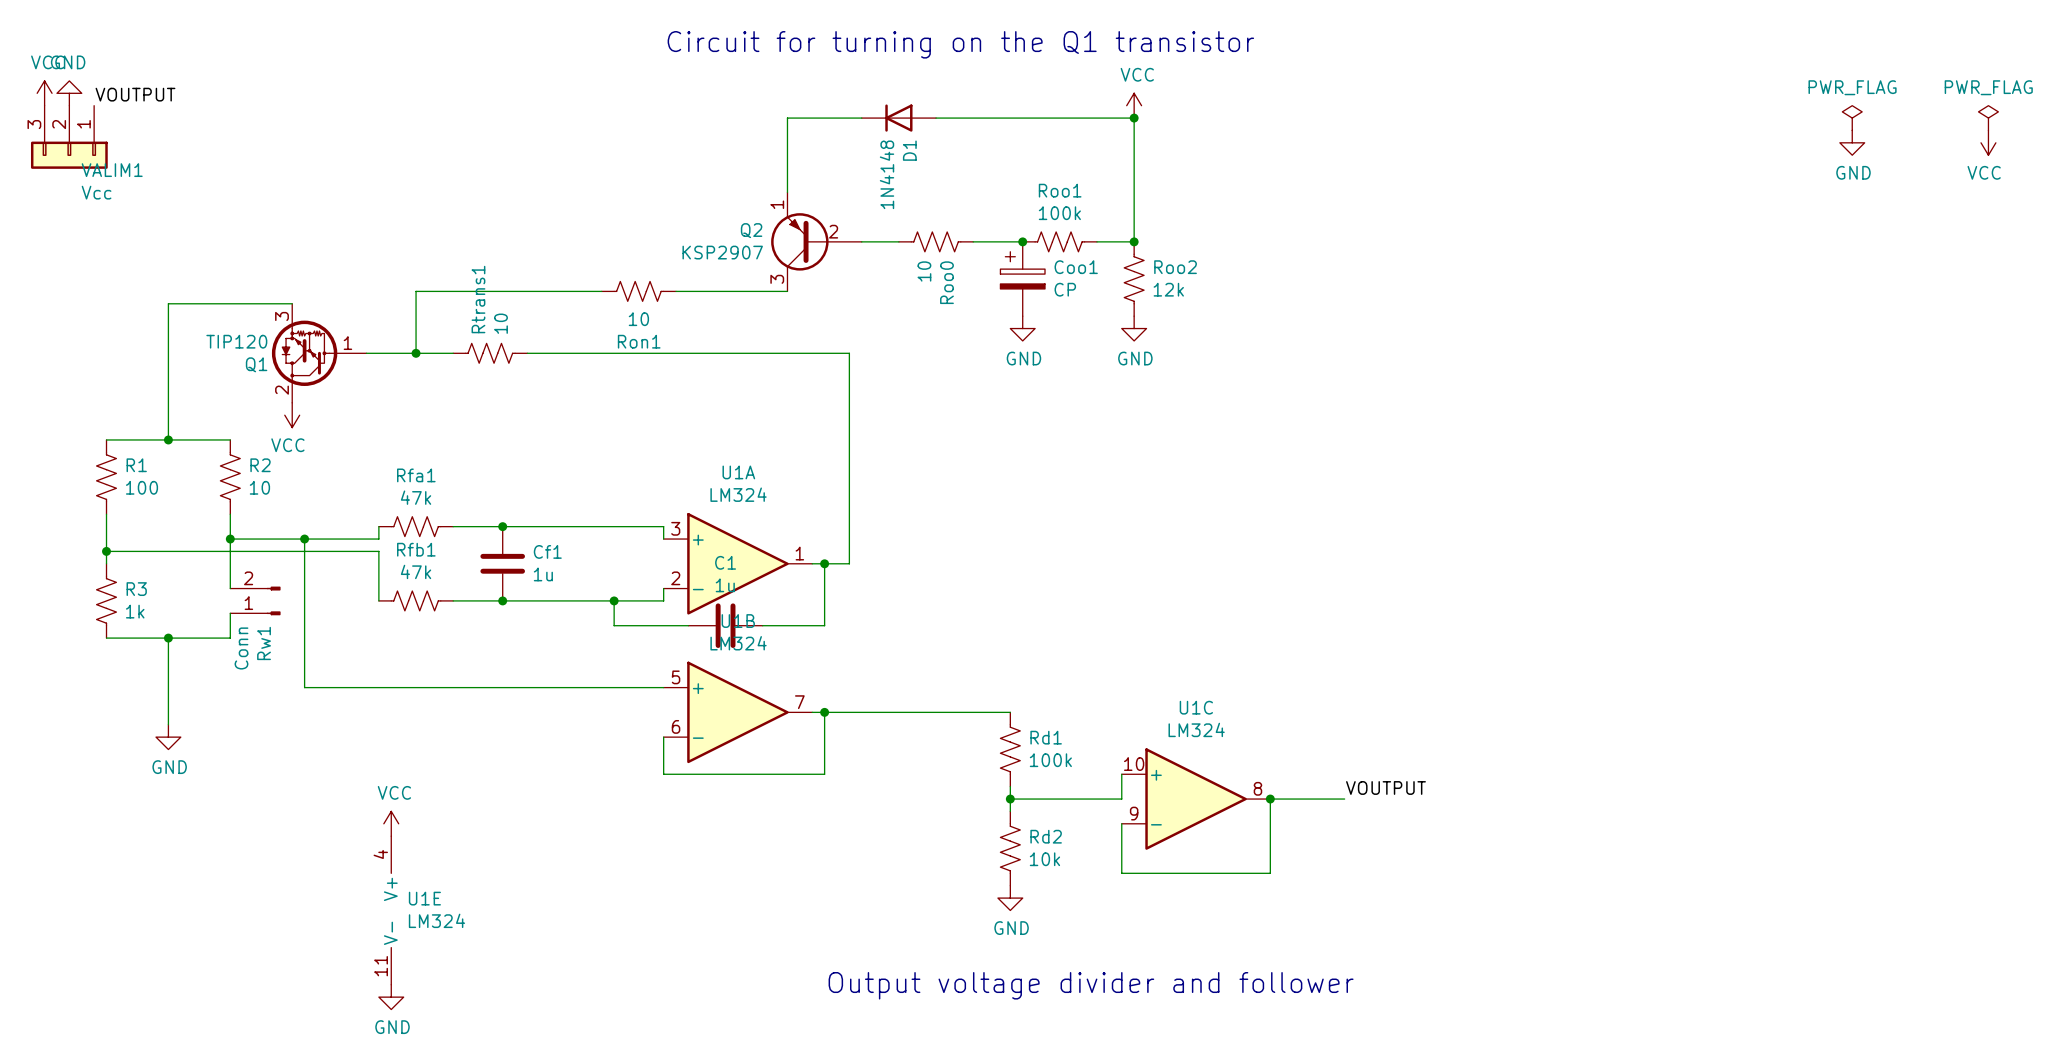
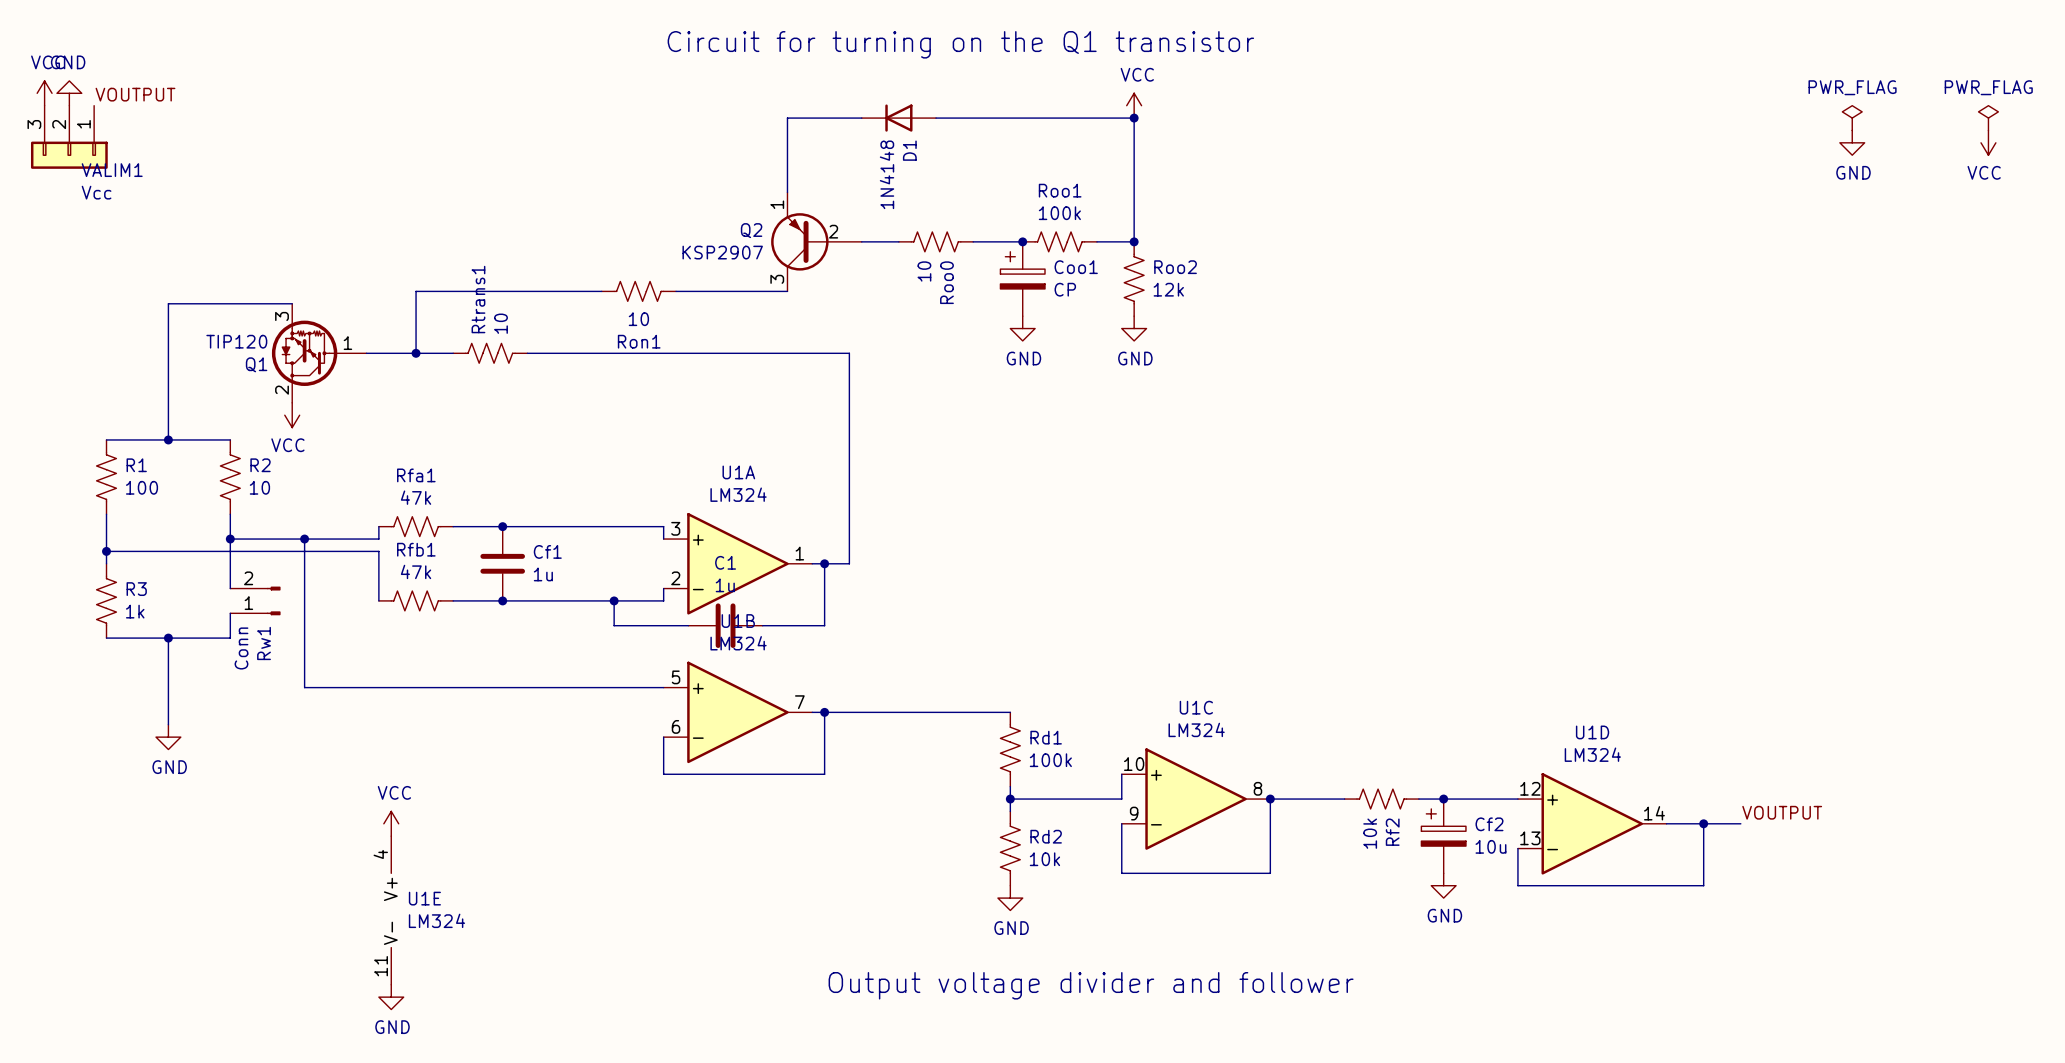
label: VOUTPUT (1385, 787) -> none
Rf2: none -> 10k (1381, 799)
wire: none -> (1418, 799) (1517, 799)
junction: none -> (1443, 799)
label: none -> VOUTPUT (1782, 812)
U1D: none -> LM324 (1592, 823)
wire: none -> (1666, 823) (1740, 823)
wire: none -> (1703, 823) (1703, 885) (1517, 885) (1517, 848)
junction: none -> (1703, 823)
Cf2: none -> 10u (1443, 836)
power symbol: none -> GND (1443, 885)

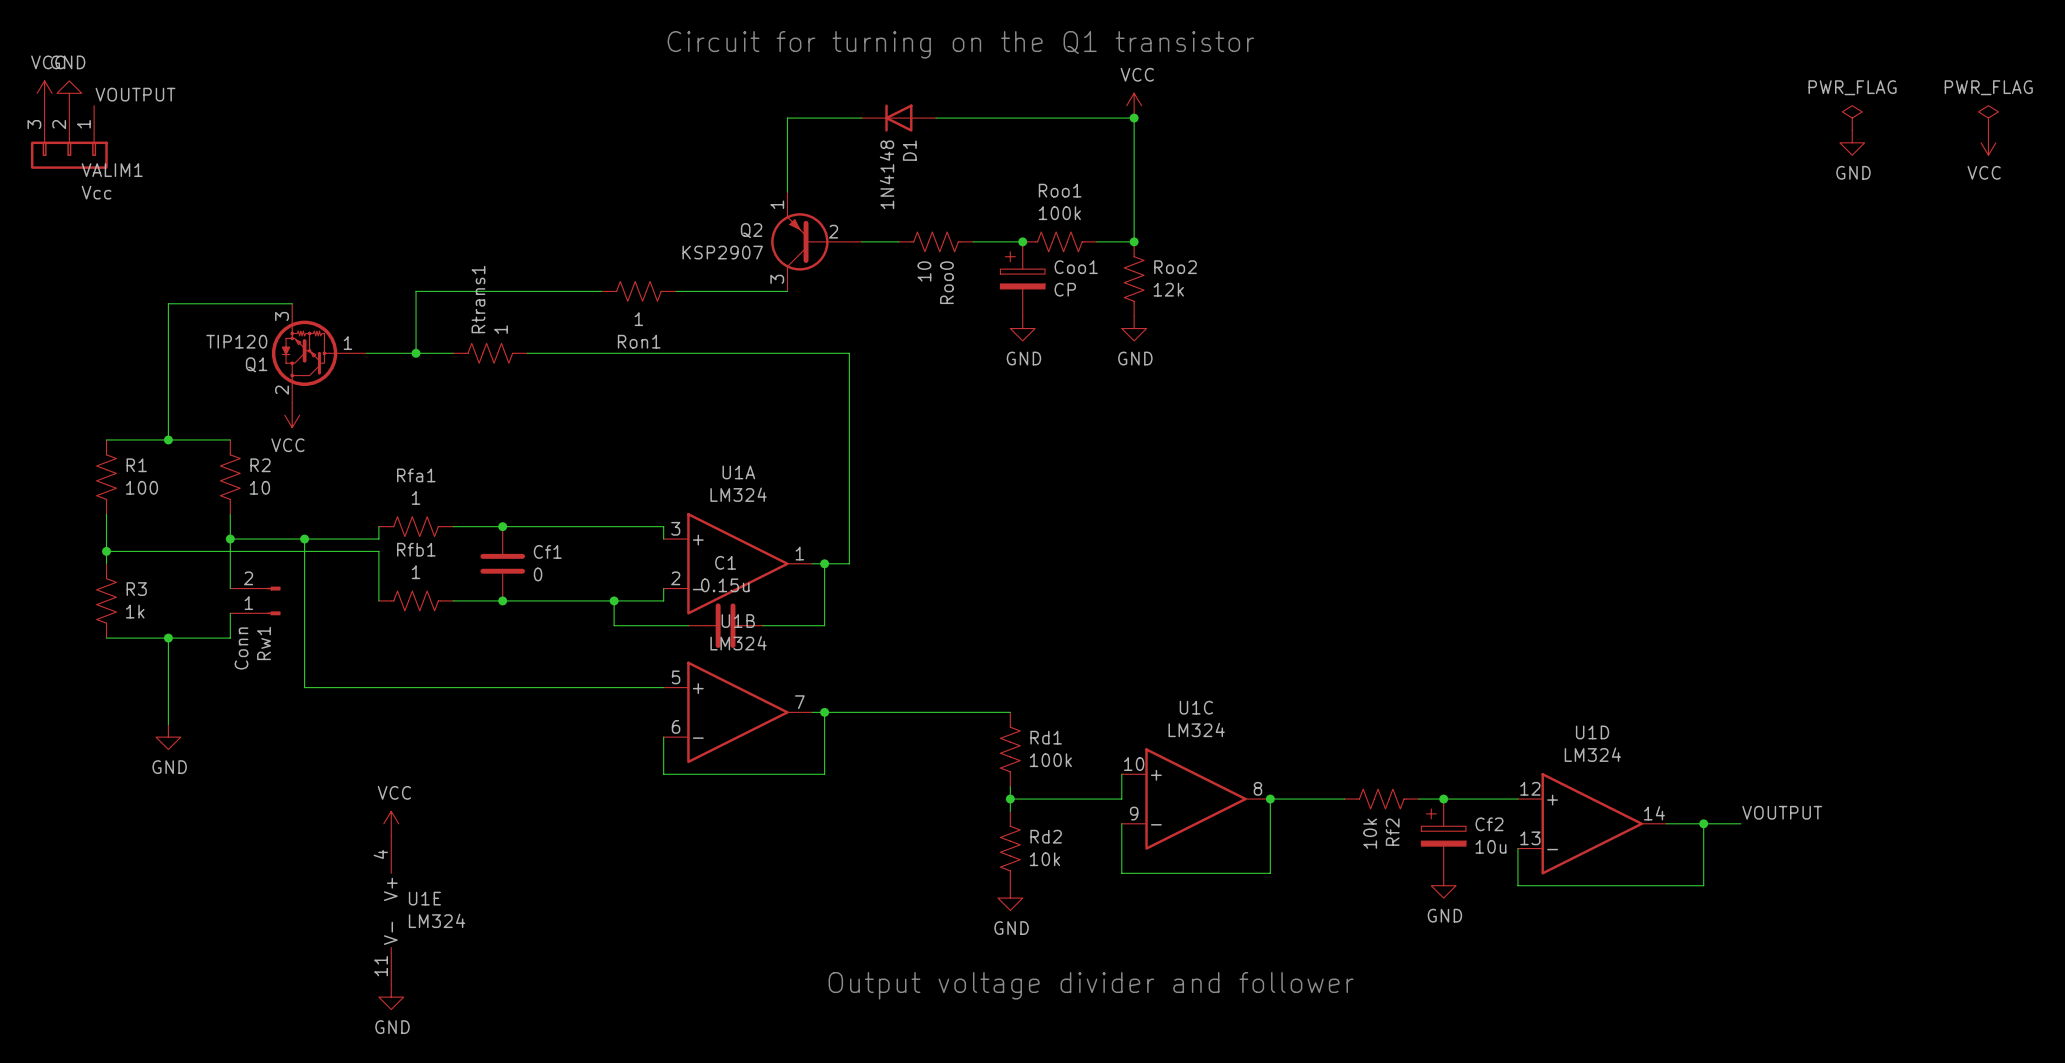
Ron1 value: 10 (638, 319) -> 1 (638, 319)
Rtrans1 value: 10 (501, 323) -> 1 (501, 329)
Rfa1 value: 47k (416, 497) -> 1 (416, 497)
Rfb1 value: 47k (416, 571) -> 1 (416, 572)
Cf1 value: 1u (543, 574) -> 0 (538, 574)
C1 value: 1u (725, 585) -> 0.15u (725, 585)

